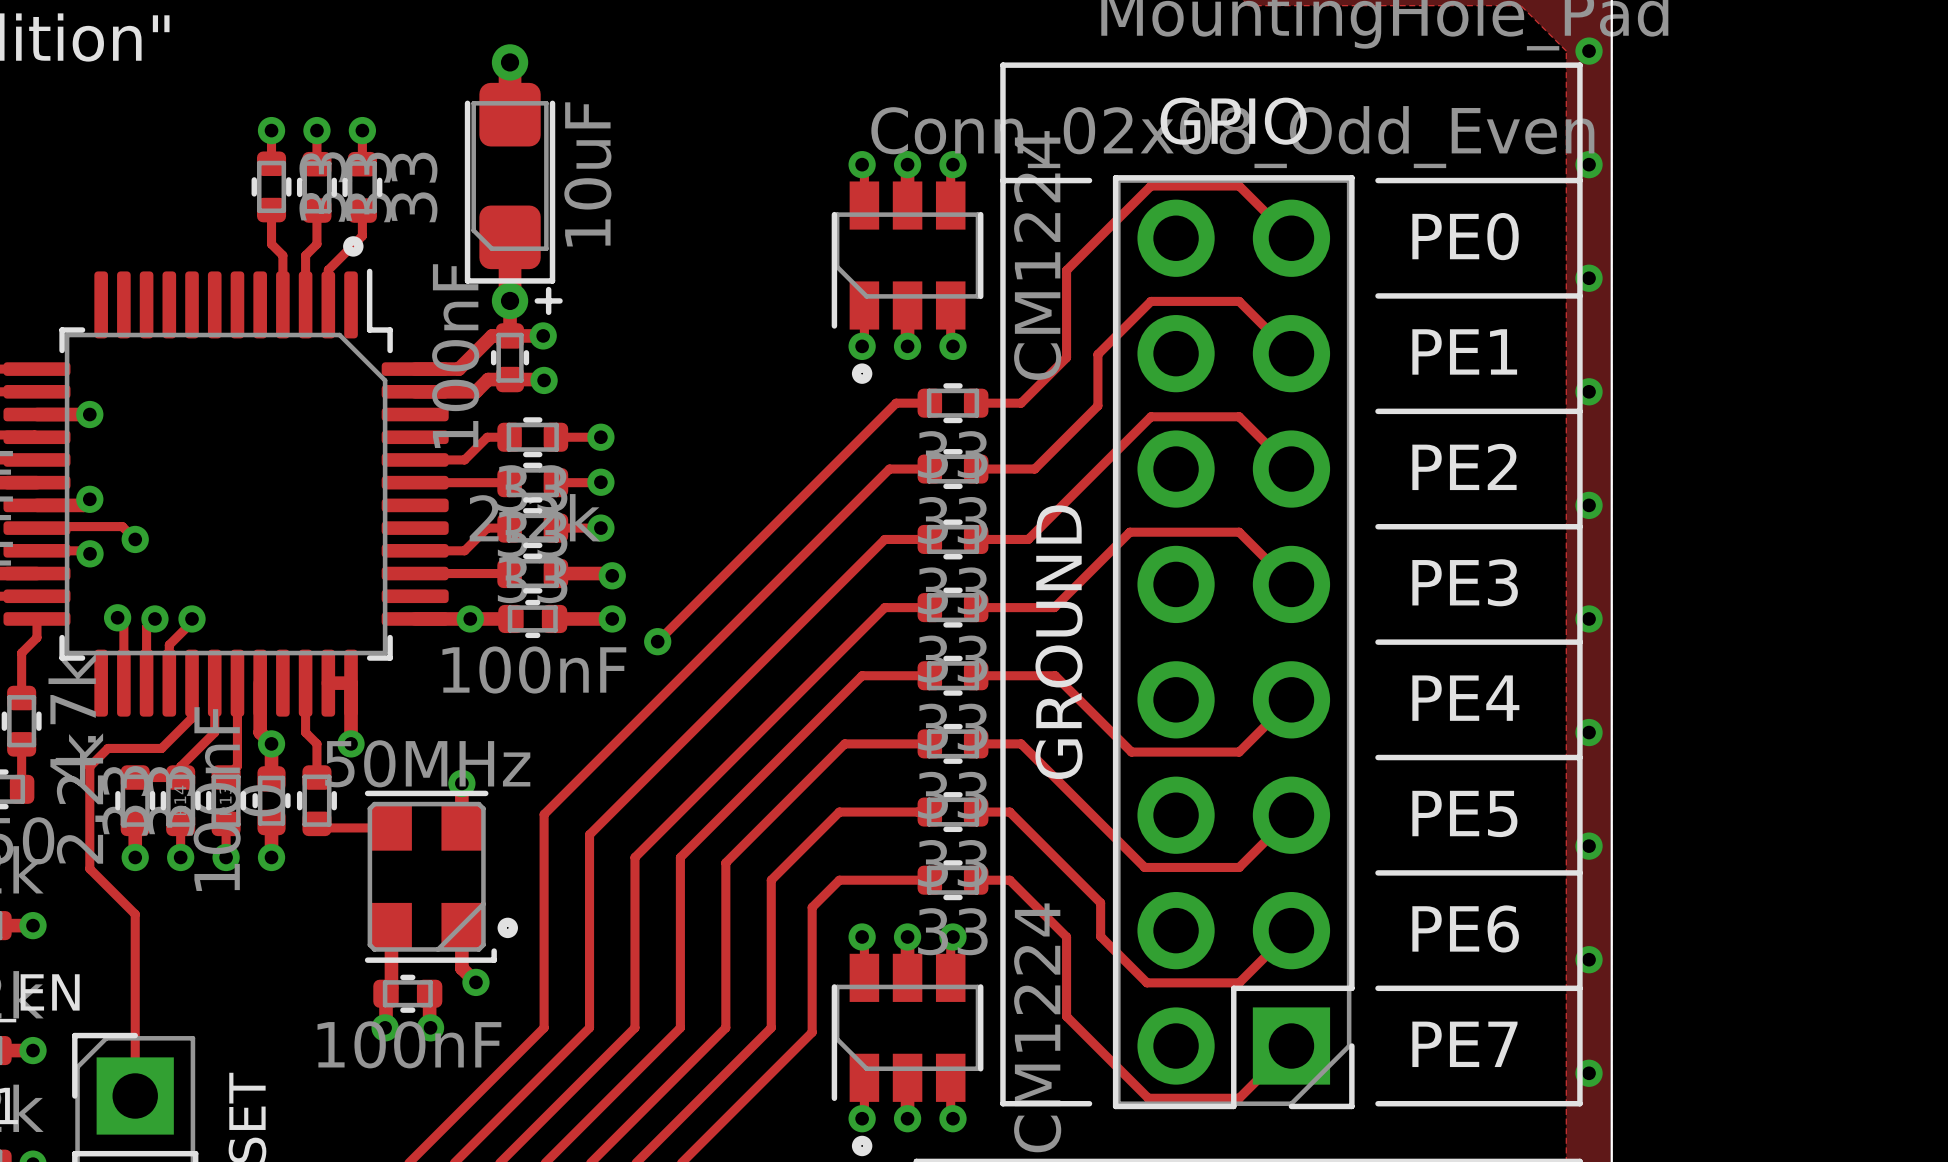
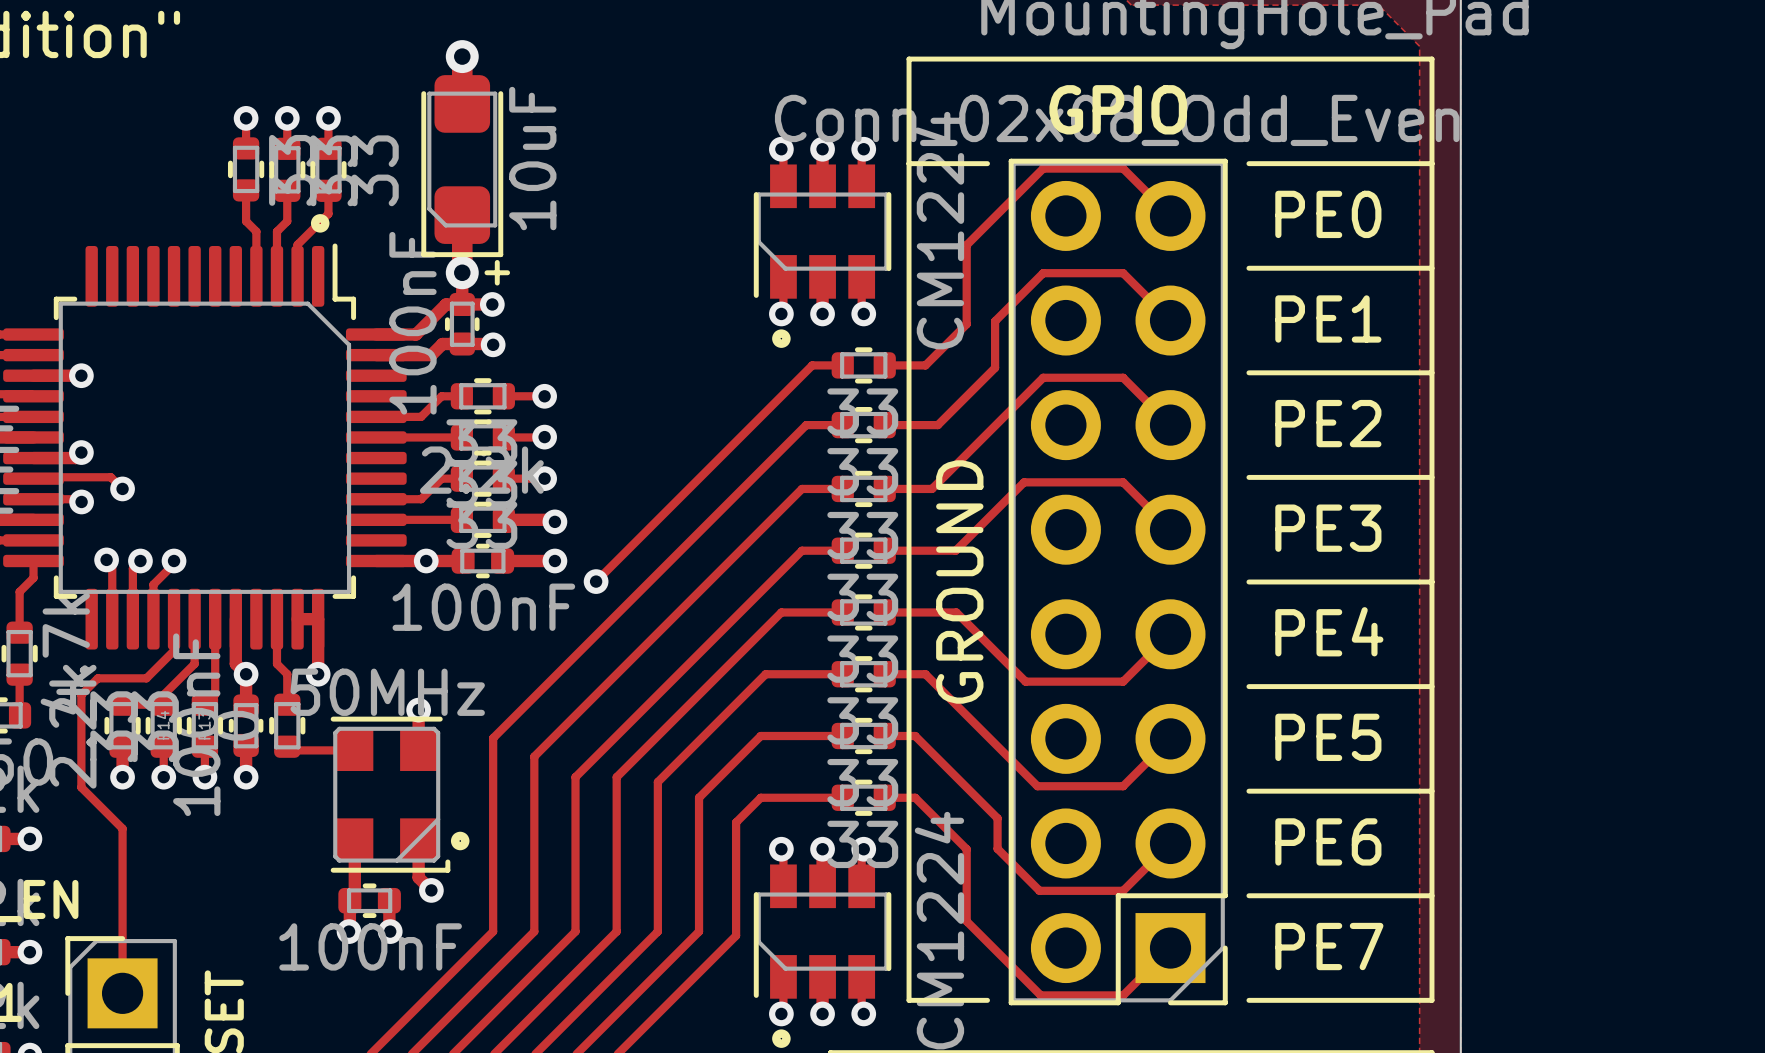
via: (1589, 51) -> none
via: (1589, 164) -> none
via: (1589, 278) -> none
via: (1589, 391) -> none
via: (1589, 505) -> none
via: (1589, 618) -> none
via: (1589, 732) -> none
via: (1589, 846) -> none
via: (1589, 959) -> none
via: (1589, 1073) -> none

